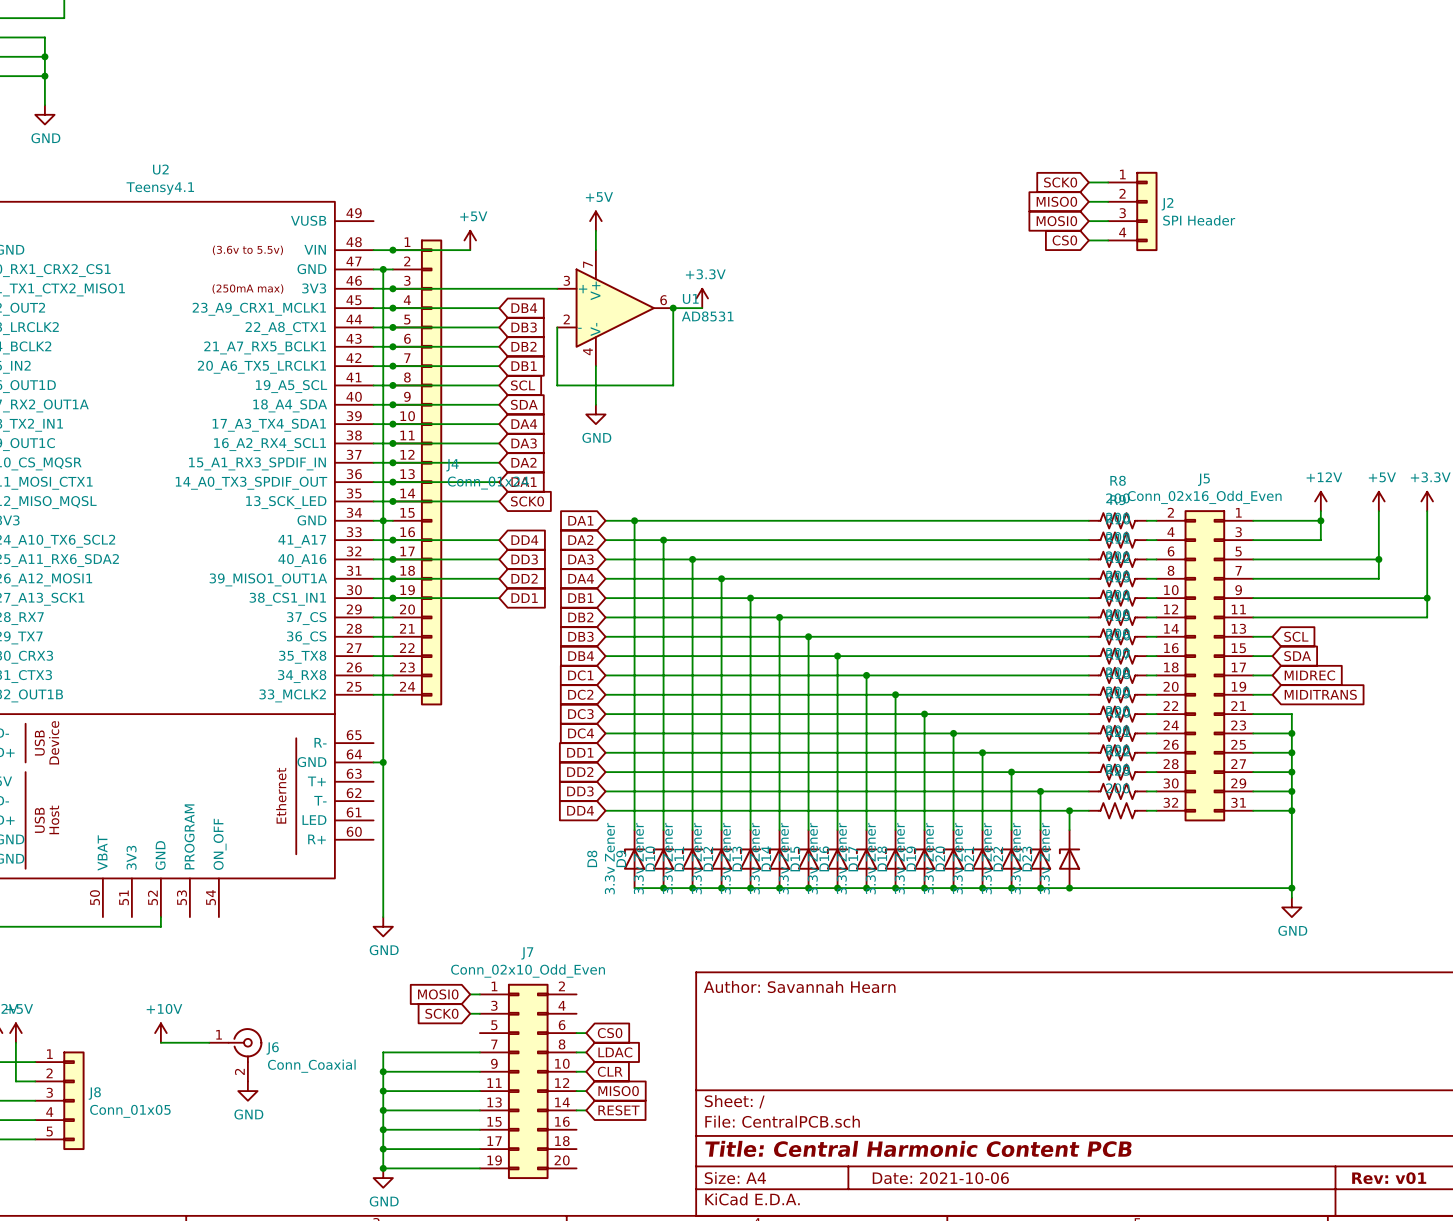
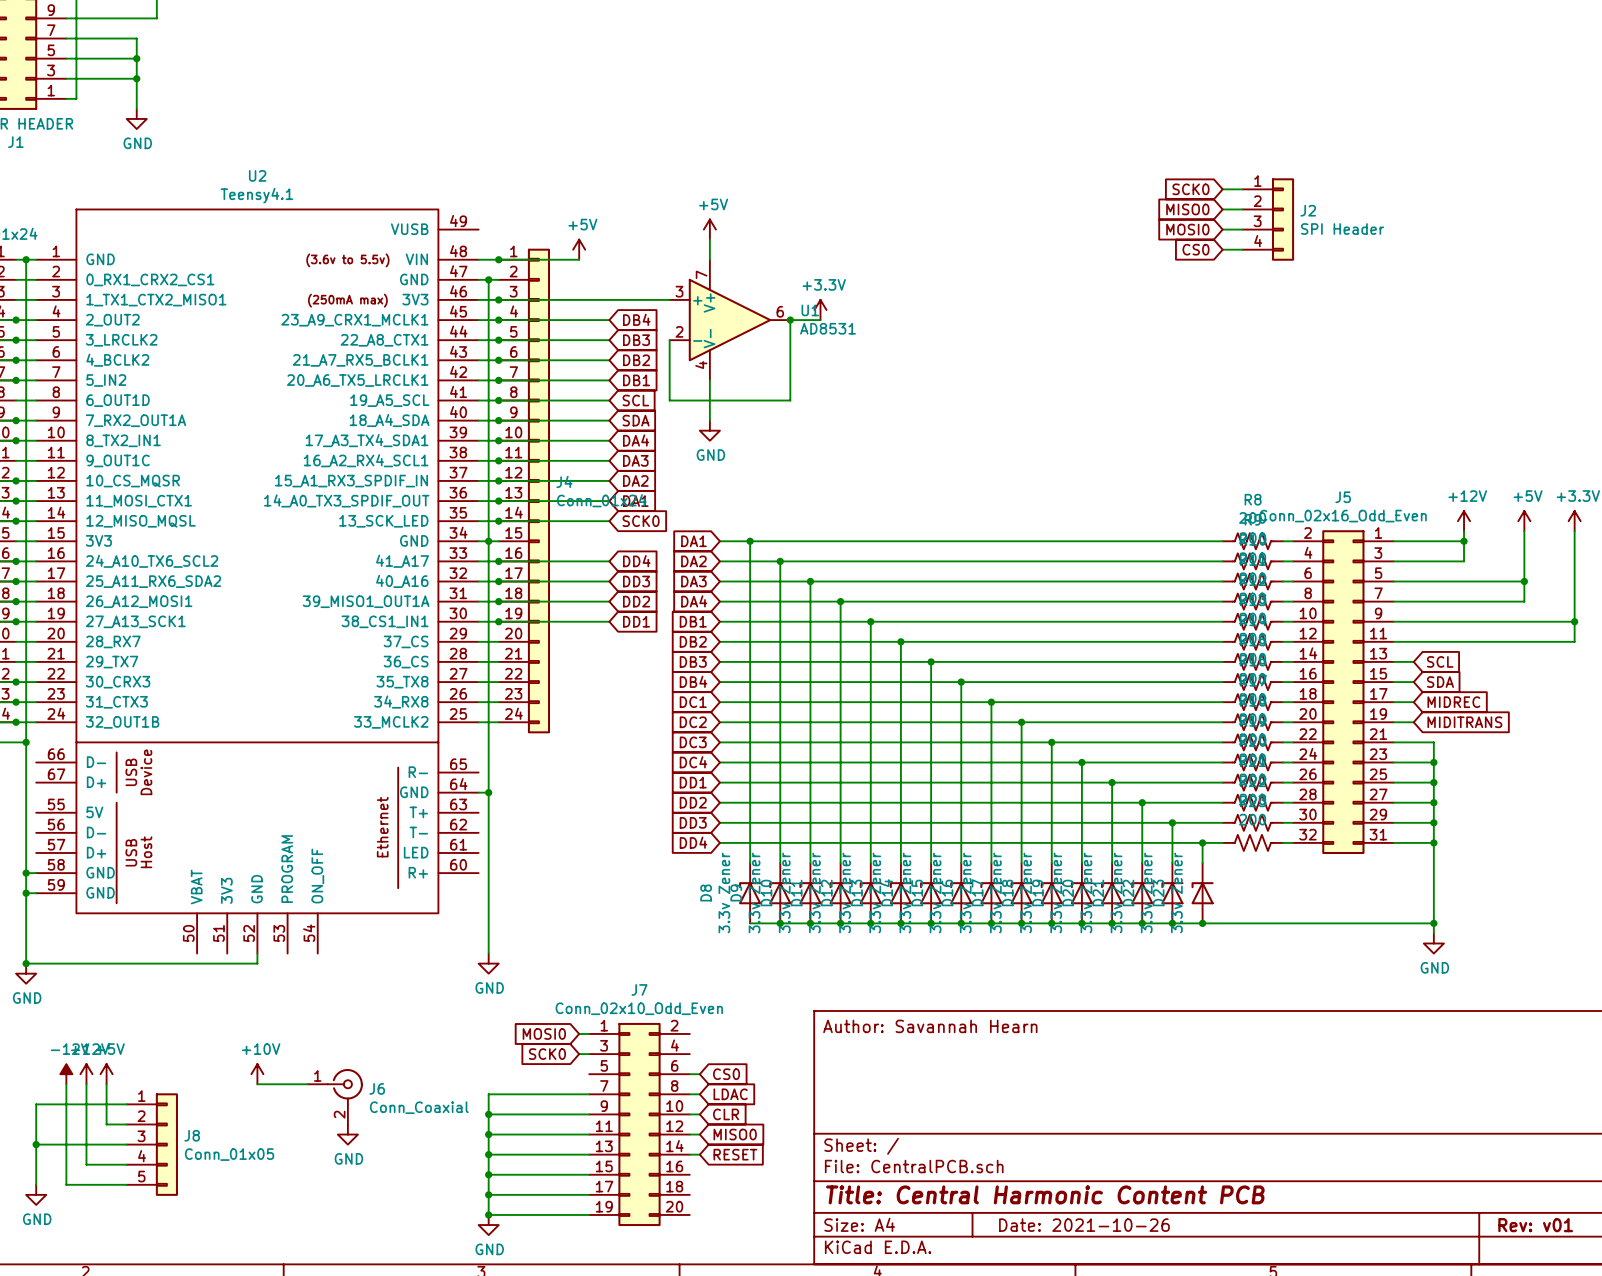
title block: Date: 2021-10-06 (940, 1178) -> Date: 2021-10-26 (1084, 1225)

